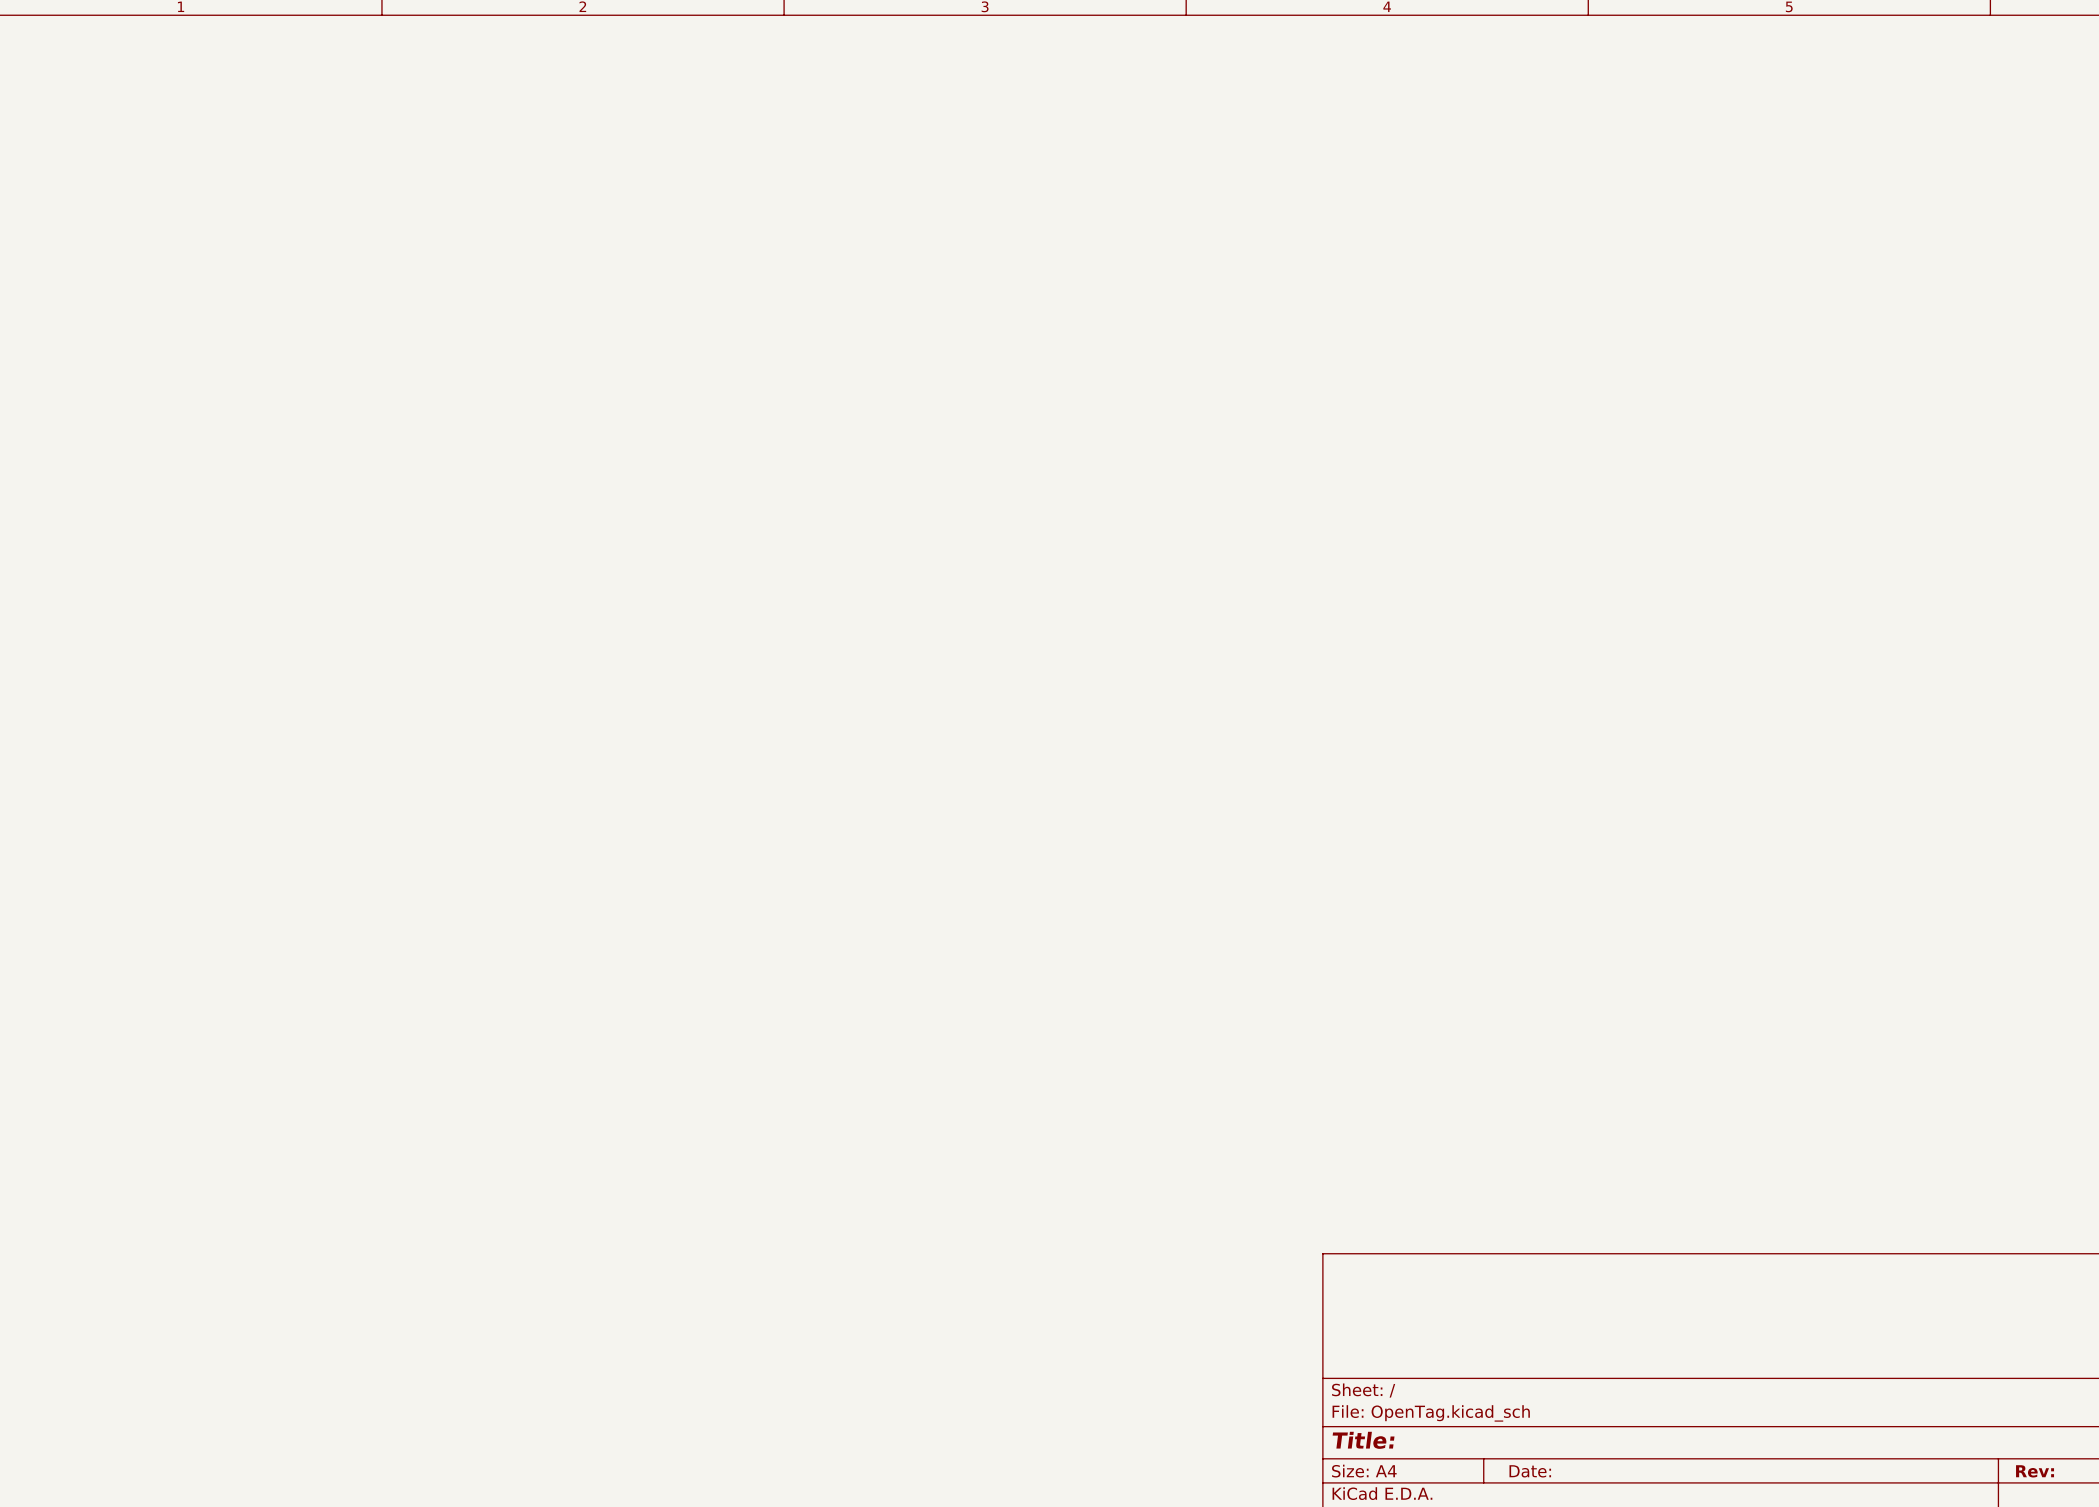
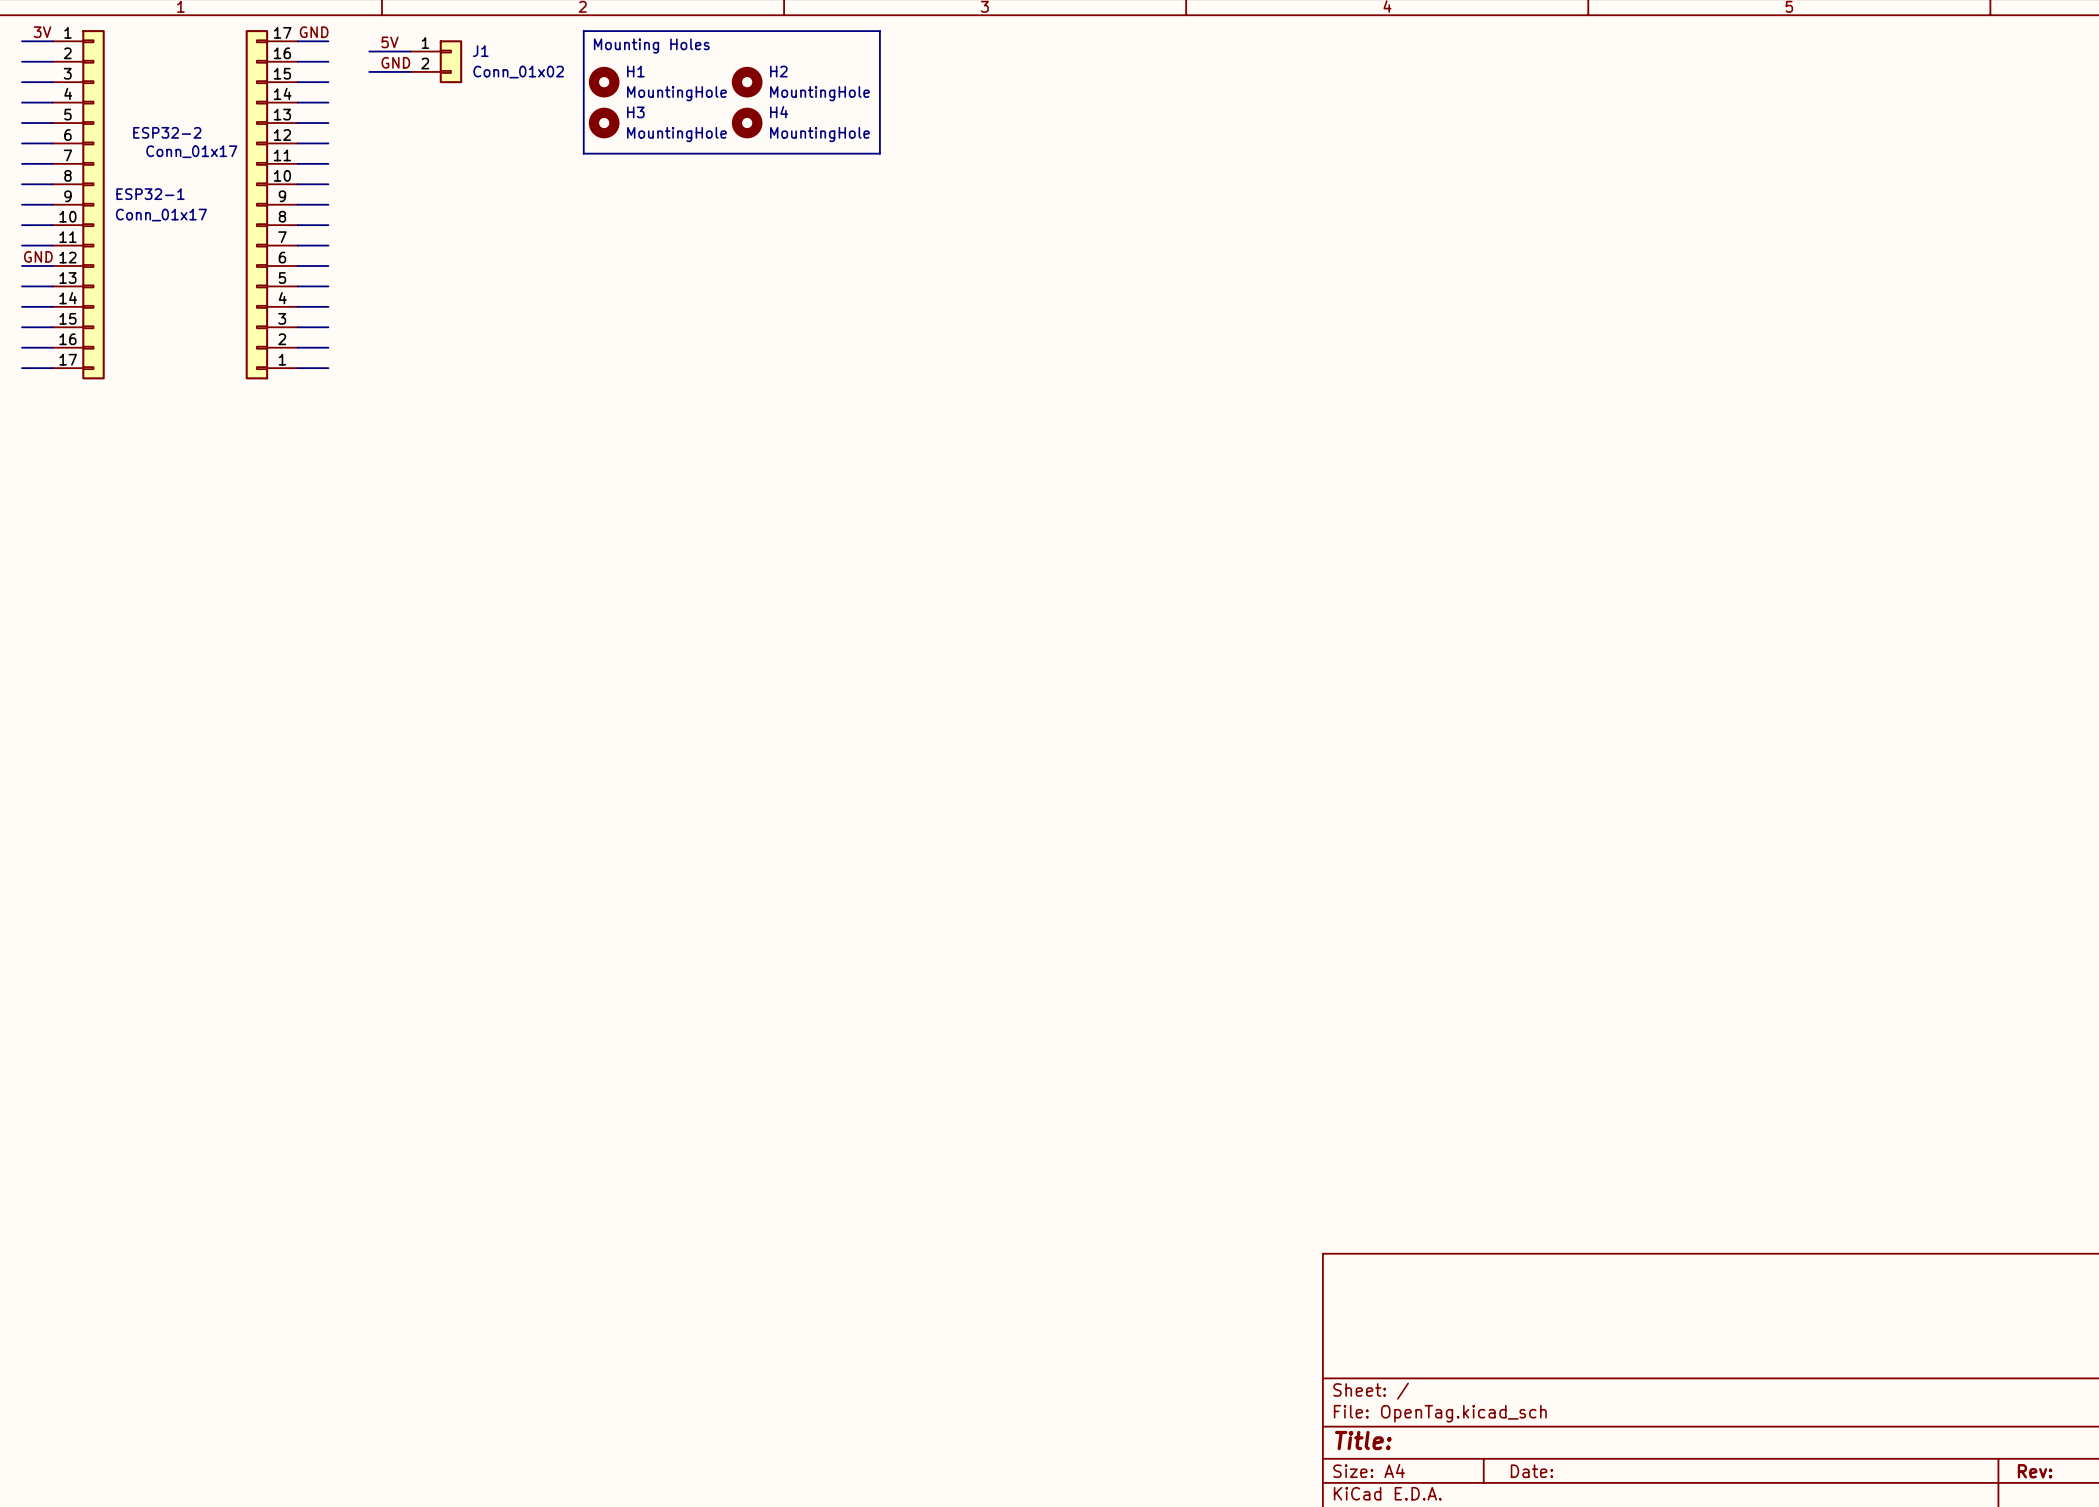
line: none -> (583, 31) (879, 31) (879, 153) (583, 153) (583, 31)
label: none -> 3V (42, 32)
label: none -> GND (314, 32)
wire: none -> (22, 41) (52, 41)
wire: none -> (297, 41) (328, 41)
label: none -> 5V (390, 42)
text: none -> Mounting Holes (651, 46)
wire: none -> (369, 51) (410, 51)
wire: none -> (22, 61) (52, 61)
wire: none -> (297, 61) (328, 61)
J1: none -> Conn_01x02 (436, 61)
label: none -> GND (395, 62)
wire: none -> (369, 71) (410, 71)
wire: none -> (22, 82) (52, 82)
wire: none -> (297, 82) (328, 82)
H1: none -> MountingHole (604, 82)
H2: none -> MountingHole (747, 82)
wire: none -> (22, 102) (52, 102)
wire: none -> (297, 102) (328, 102)
wire: none -> (22, 123) (52, 123)
wire: none -> (297, 123) (328, 123)
H3: none -> MountingHole (604, 123)
H4: none -> MountingHole (747, 123)
wire: none -> (22, 143) (52, 143)
wire: none -> (297, 143) (328, 143)
wire: none -> (22, 163) (52, 163)
wire: none -> (297, 163) (328, 163)
wire: none -> (22, 184) (52, 184)
wire: none -> (297, 184) (328, 184)
wire: none -> (22, 204) (52, 204)
ESP32-1: none -> Conn_01x17 (78, 204)
ESP32-2: none -> Conn_01x17 (271, 204)
wire: none -> (297, 204) (328, 204)
wire: none -> (22, 225) (52, 225)
wire: none -> (297, 225) (328, 225)
wire: none -> (22, 245) (52, 245)
wire: none -> (297, 245) (328, 245)
label: none -> GND (38, 256)
wire: none -> (22, 266) (52, 266)
wire: none -> (297, 266) (328, 266)
wire: none -> (22, 286) (52, 286)
wire: none -> (297, 286) (328, 286)
wire: none -> (22, 306) (52, 306)
wire: none -> (297, 306) (328, 306)
wire: none -> (22, 327) (52, 327)
wire: none -> (297, 327) (328, 327)
wire: none -> (22, 347) (52, 347)
wire: none -> (297, 347) (328, 347)
wire: none -> (22, 368) (52, 368)
wire: none -> (297, 368) (328, 368)

